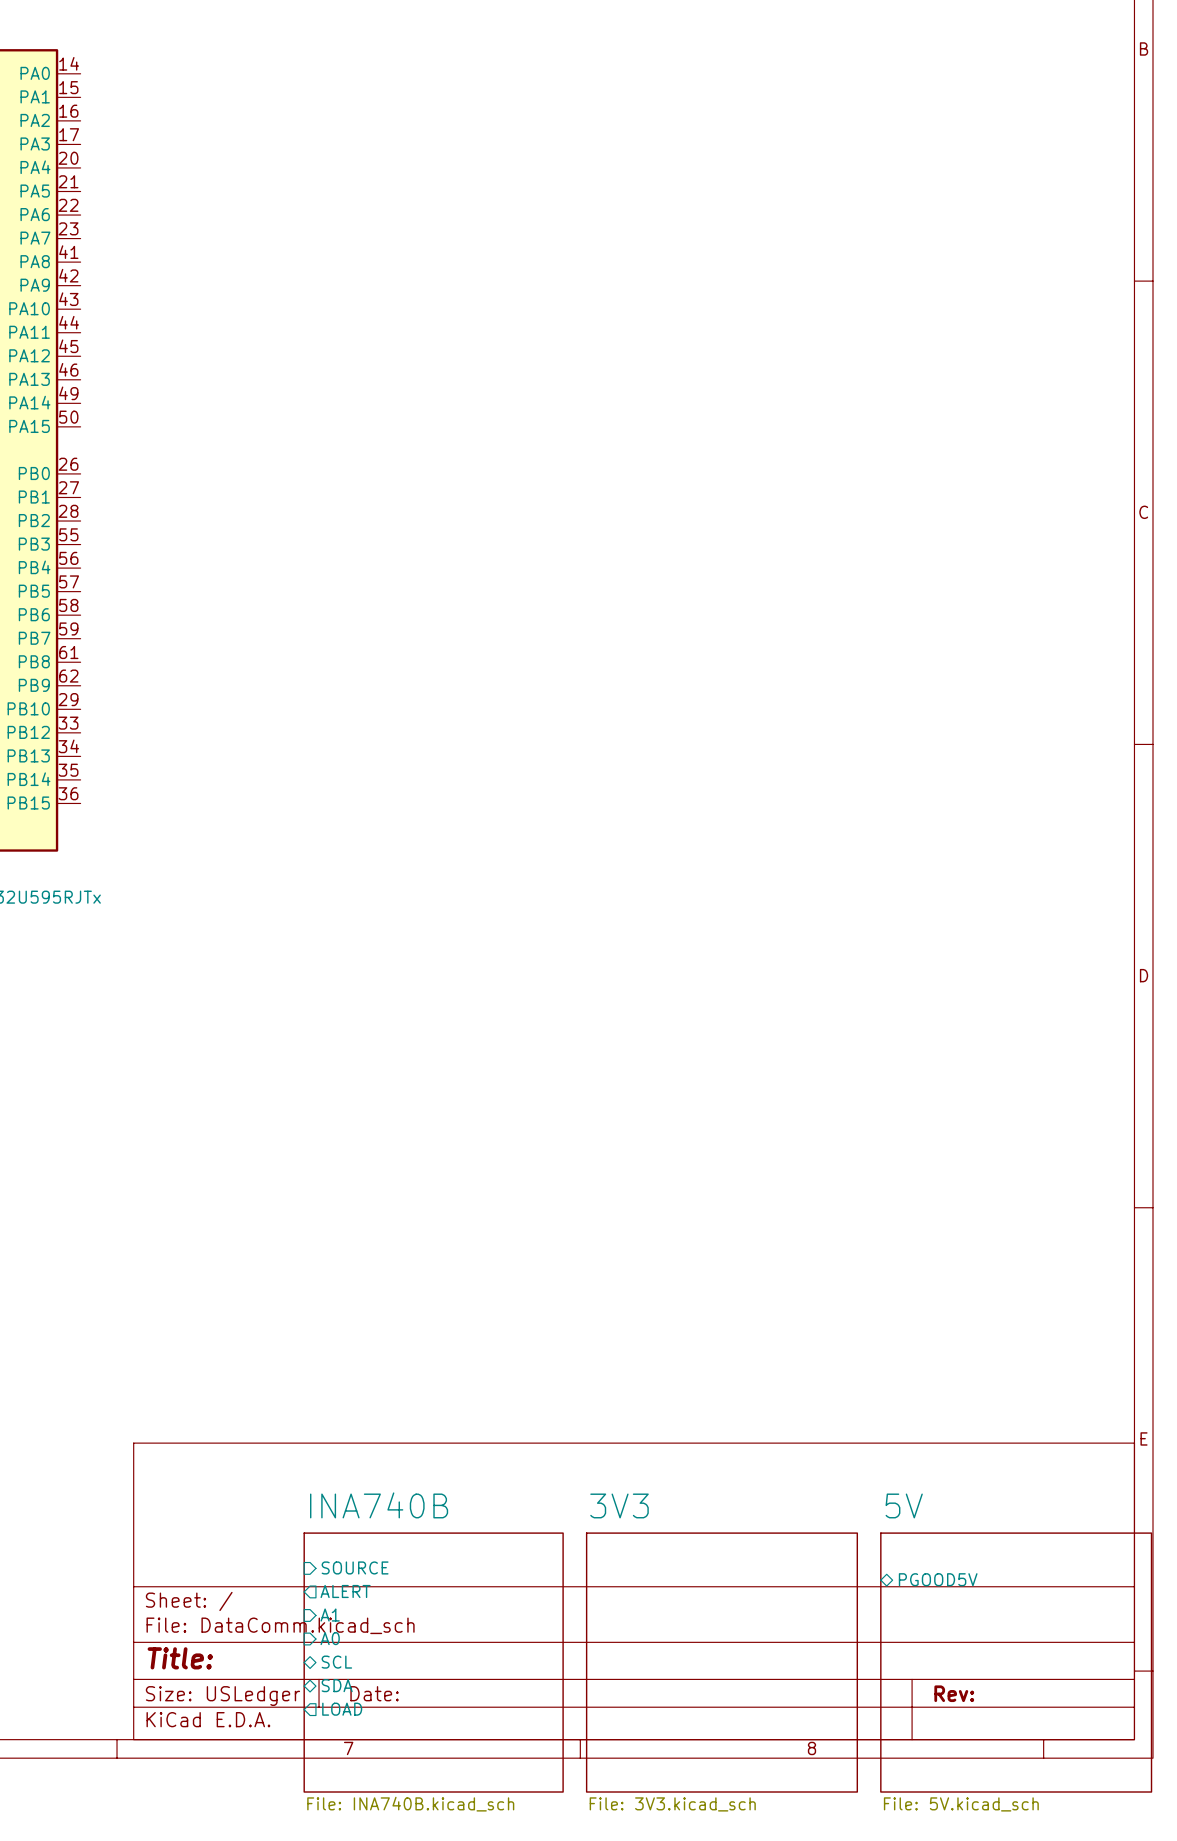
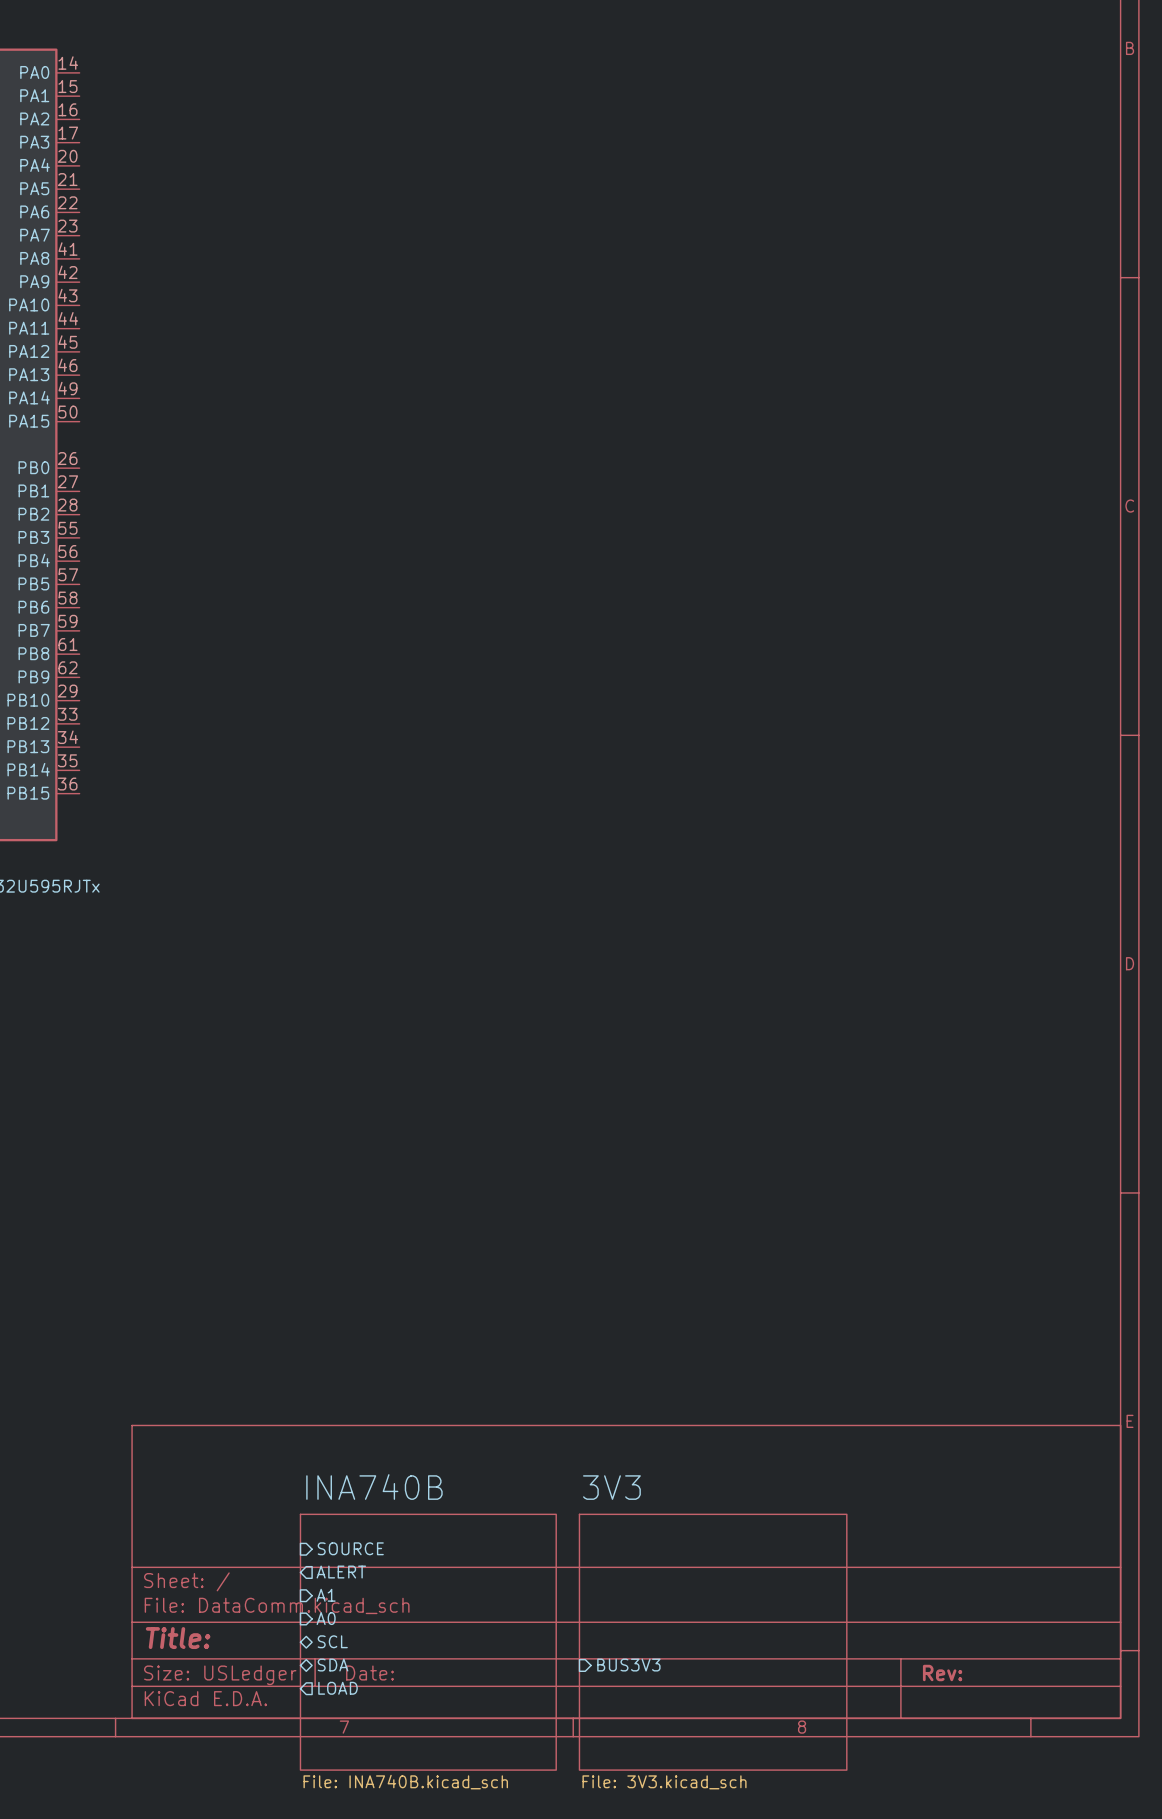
sheet pin: PGOOD5V (938, 1579) -> none
sheet 5V: File: 5V.kicad_sch (1016, 1662) -> none
sheet pin: none -> BUS3V3 (628, 1665)

